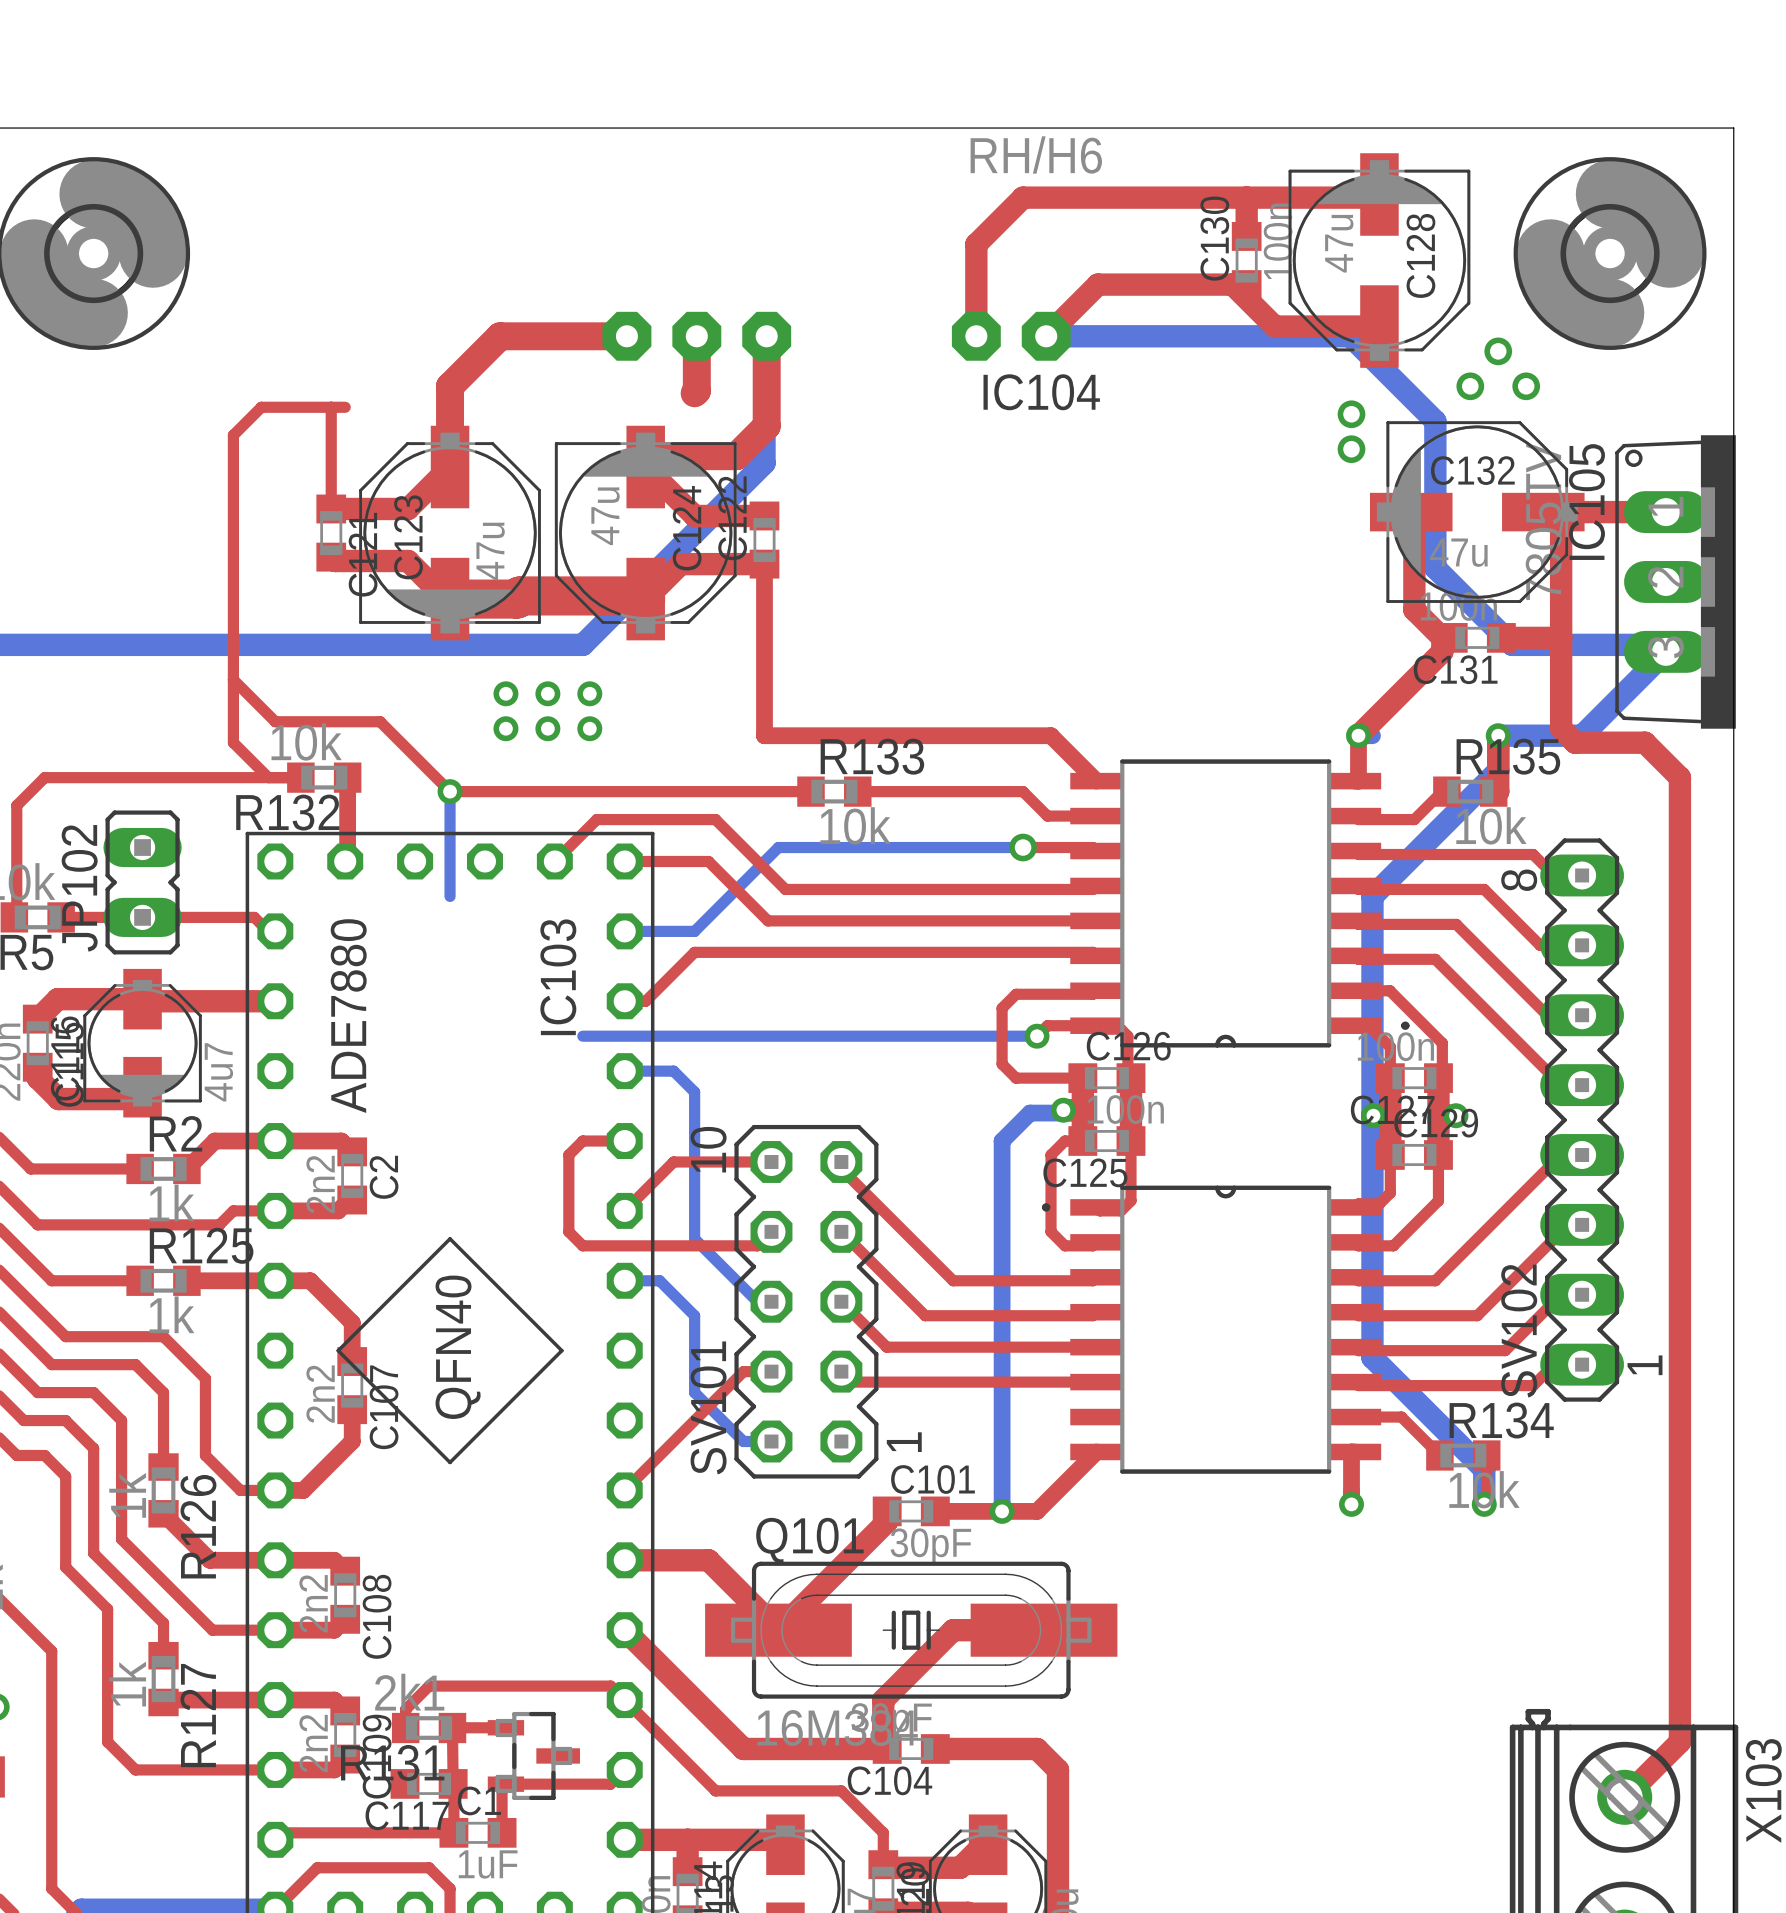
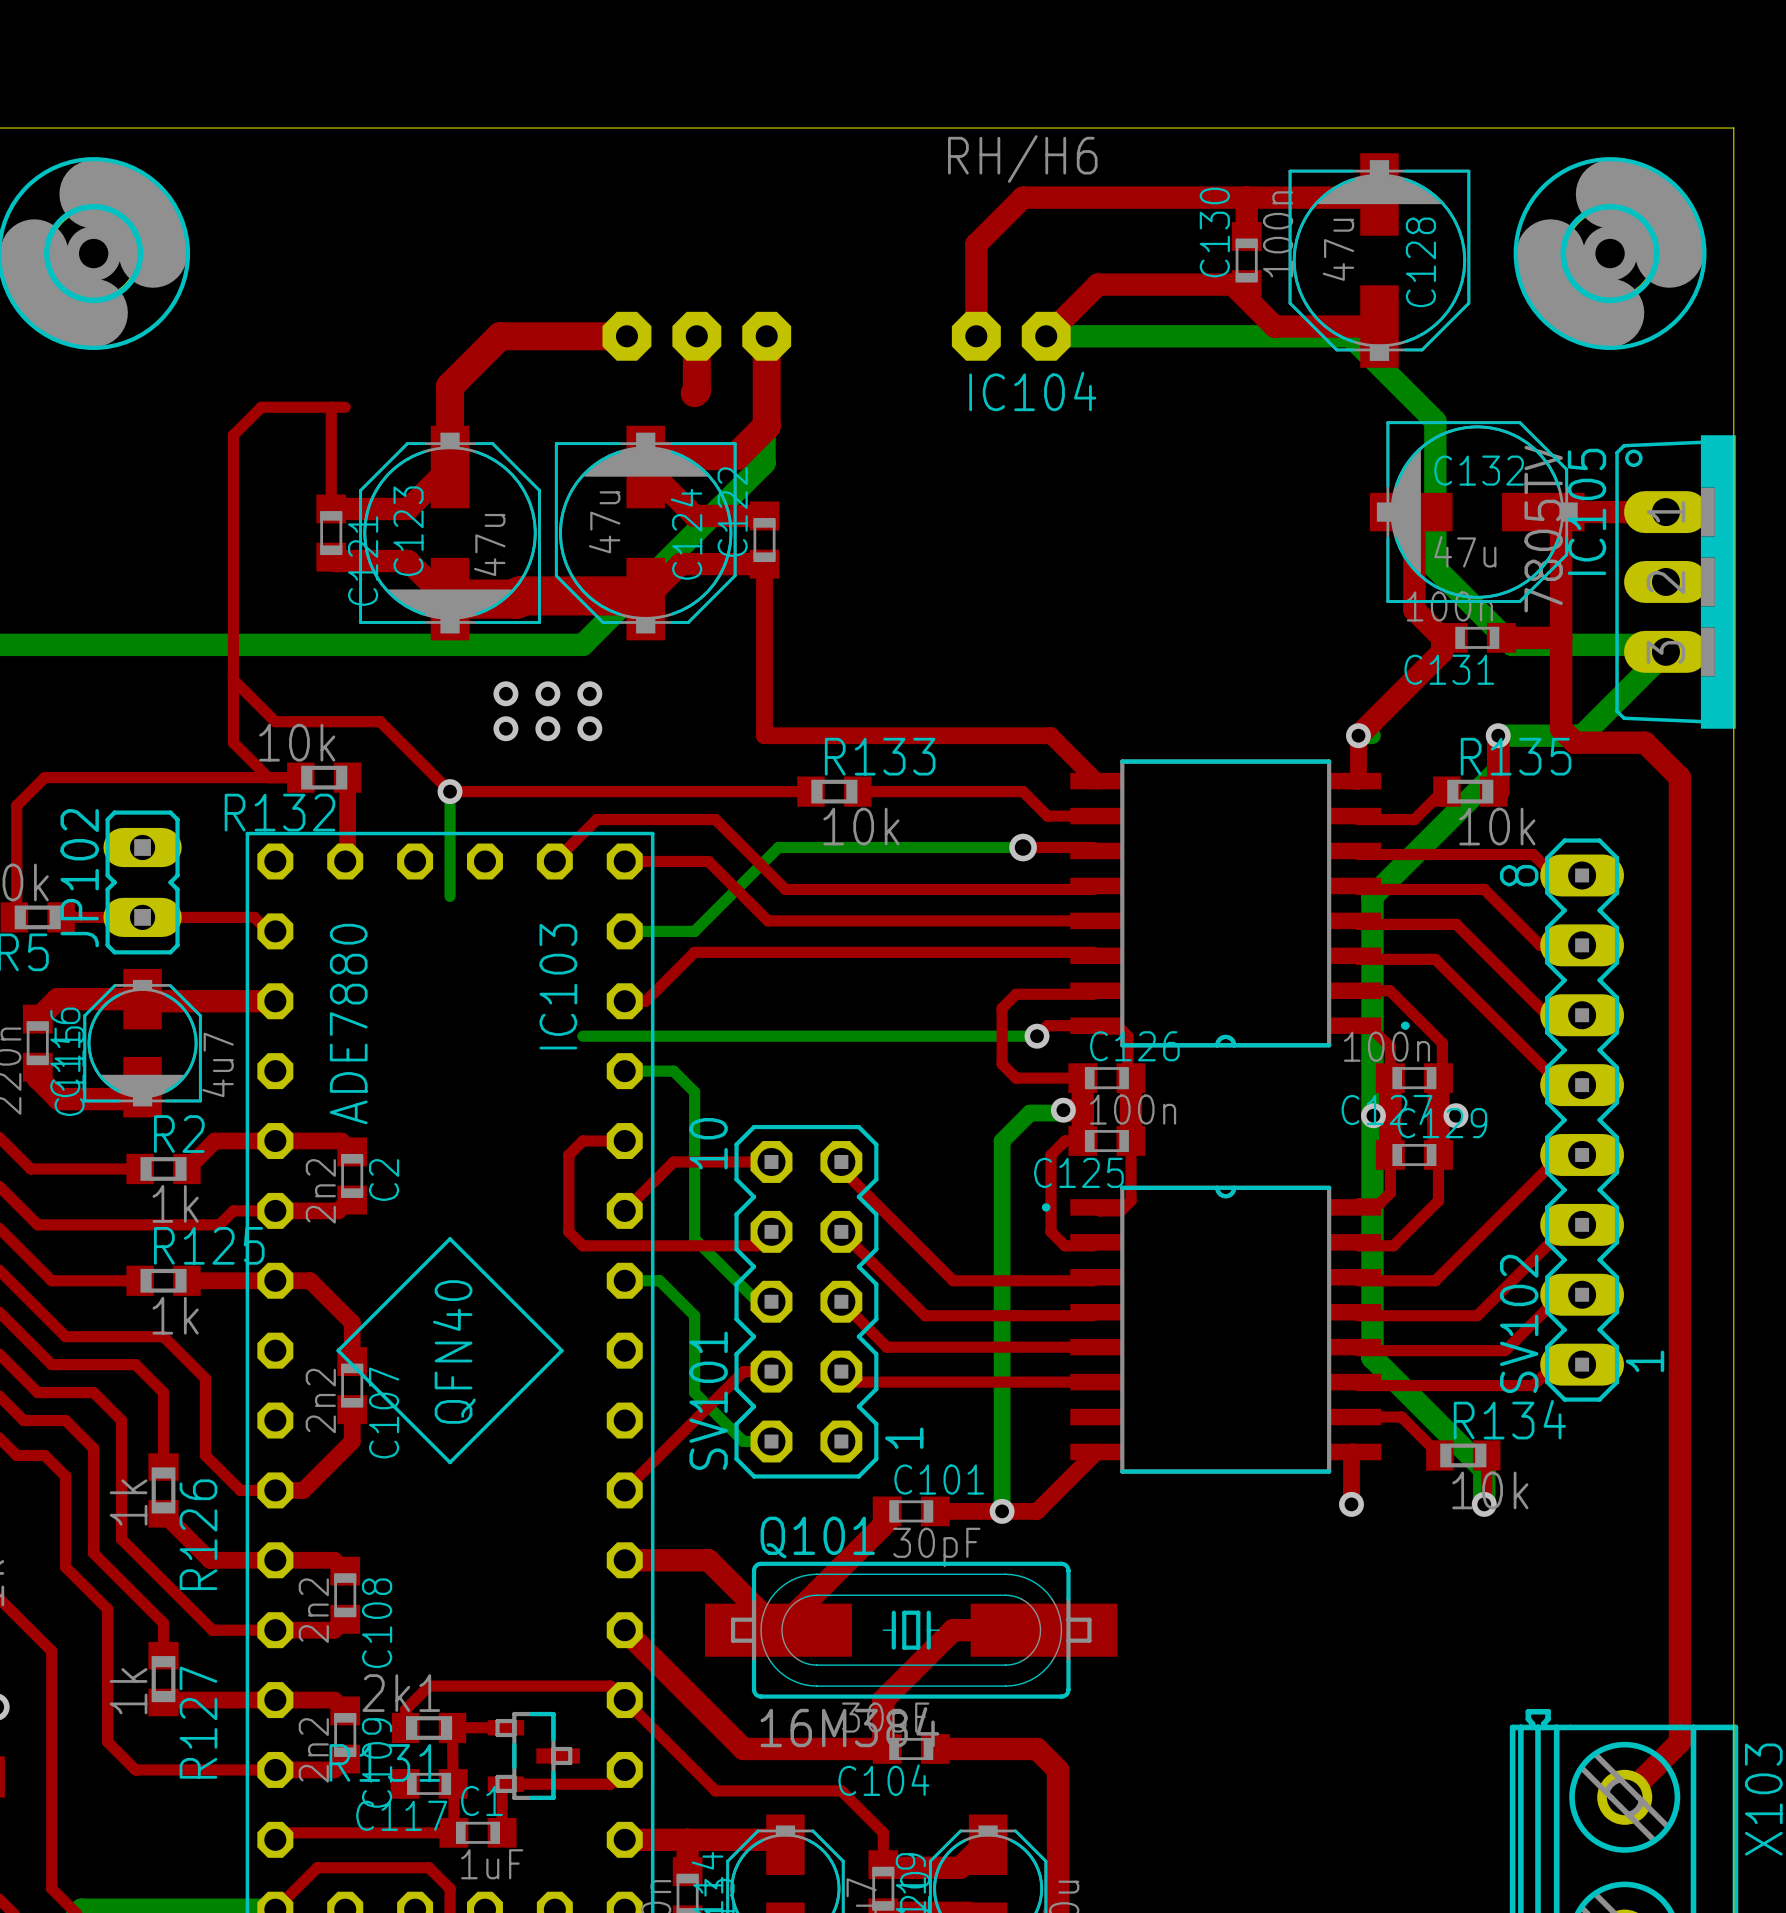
via: (1498, 351) -> none
via: (1470, 386) -> none
via: (1526, 386) -> none
via: (1351, 414) -> none
via: (1351, 449) -> none

